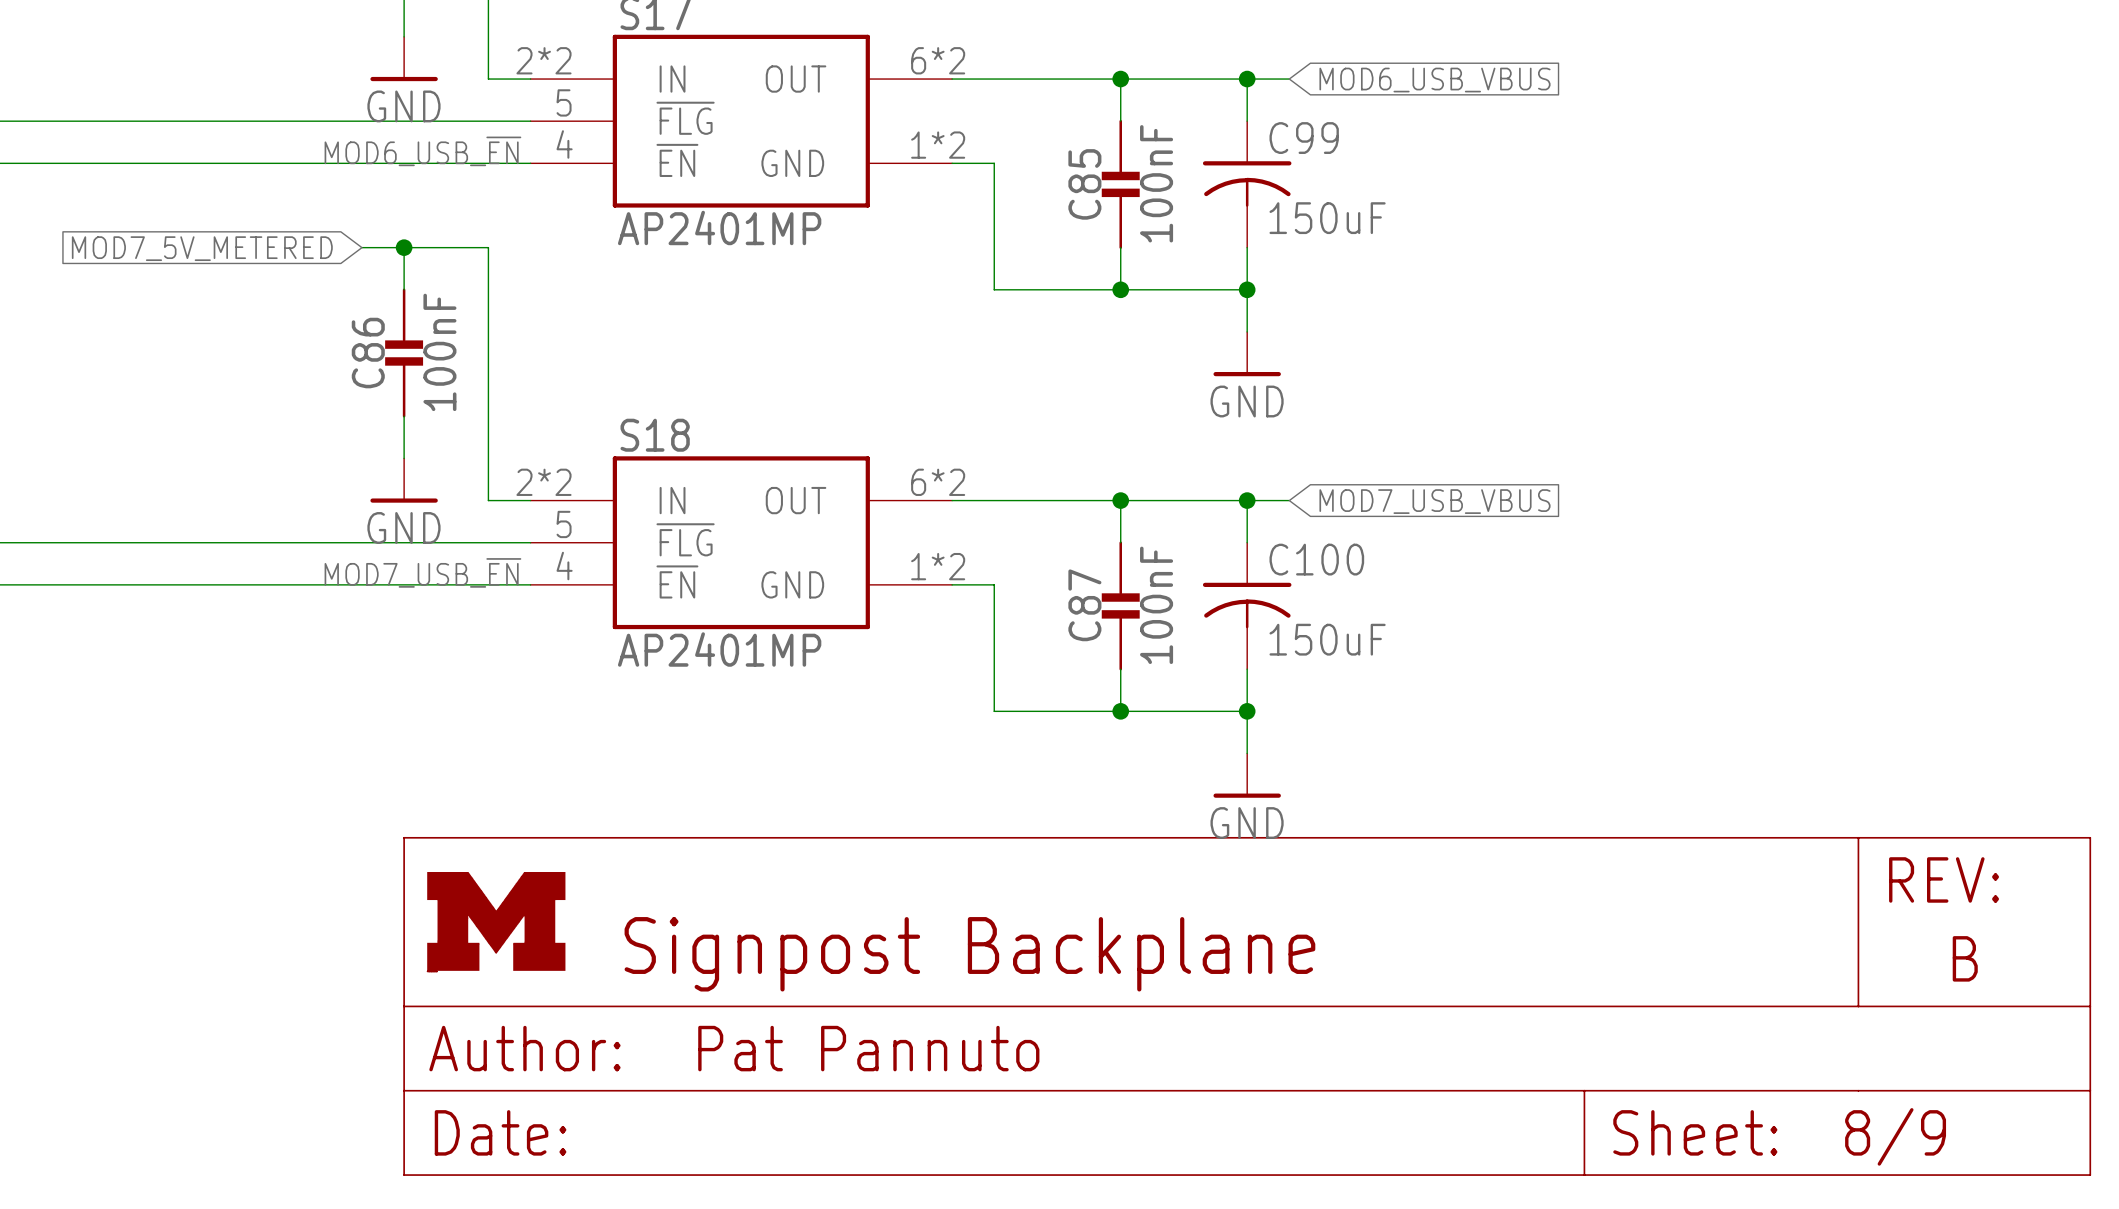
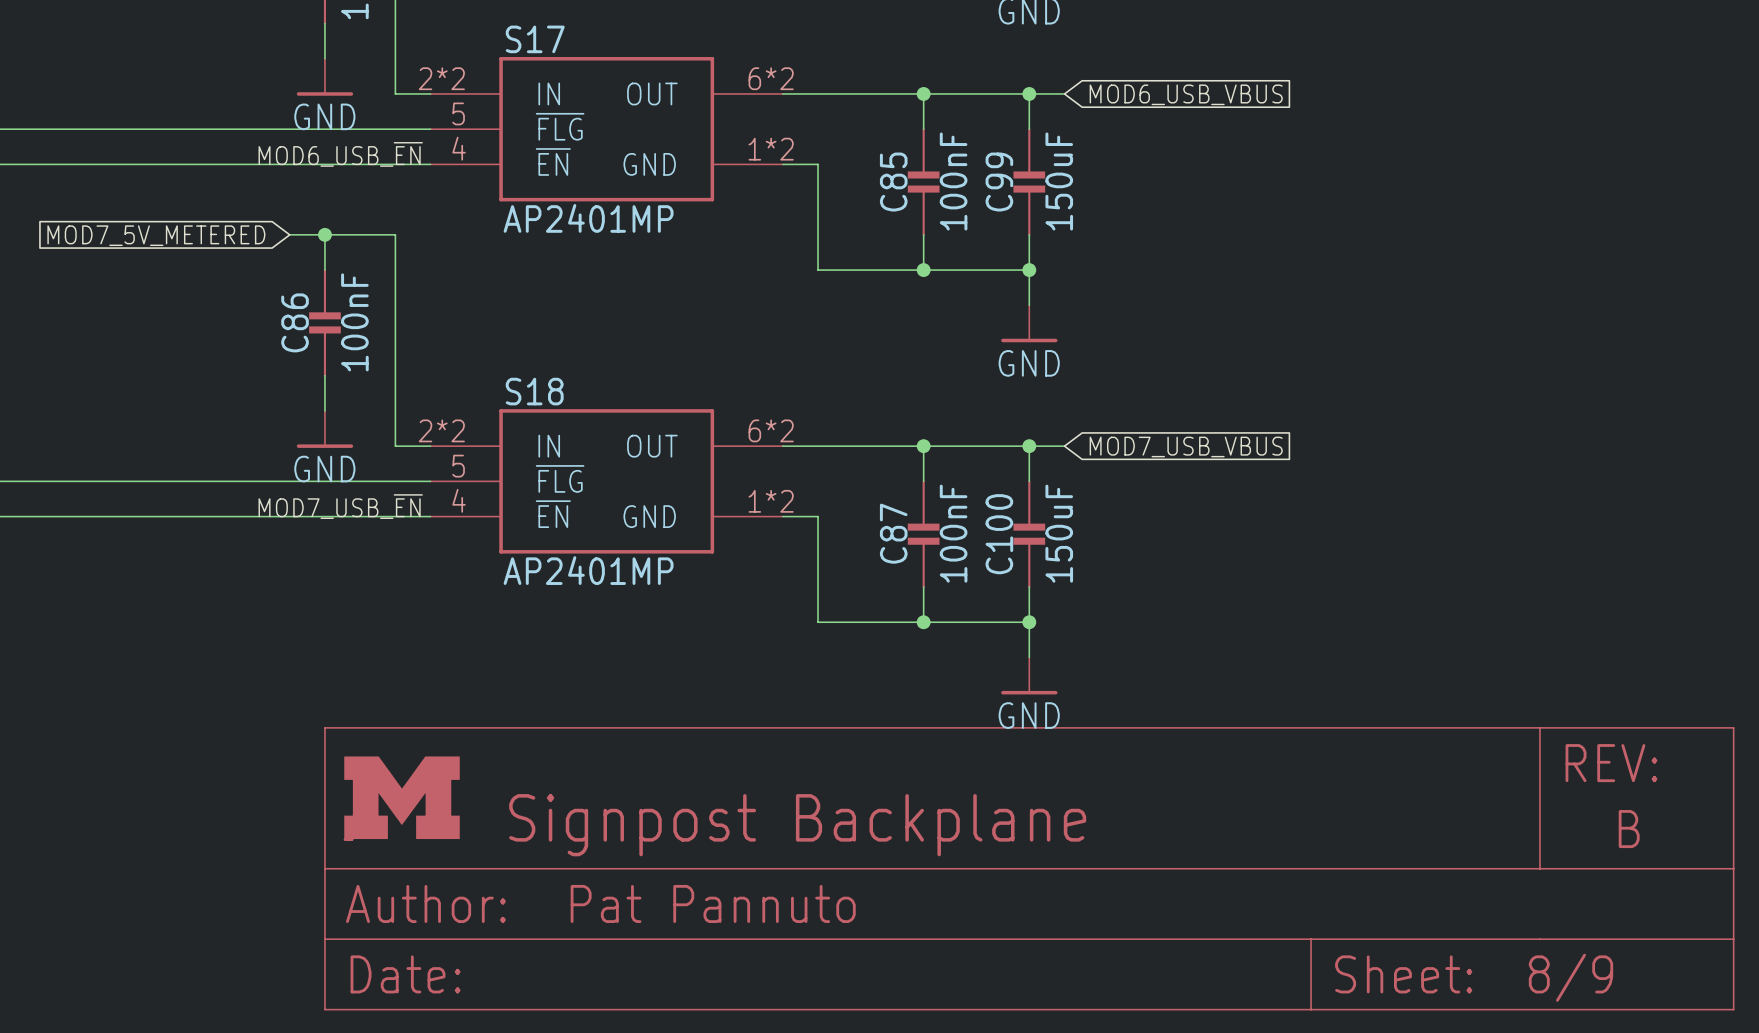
C99 symbol: [1202, 121, 1292, 248] -> [1013, 128, 1046, 236]
C99 name position: C99 (1304, 138) -> C99 (999, 182)
C99 value position: 150uF (1327, 218) -> 150uF (1059, 181)
C100 symbol: [1202, 542, 1292, 670] -> [1013, 480, 1046, 589]
C100 name position: C100 (1316, 559) -> C100 (999, 534)
C100 value position: 150uF (1327, 639) -> 150uF (1059, 533)

